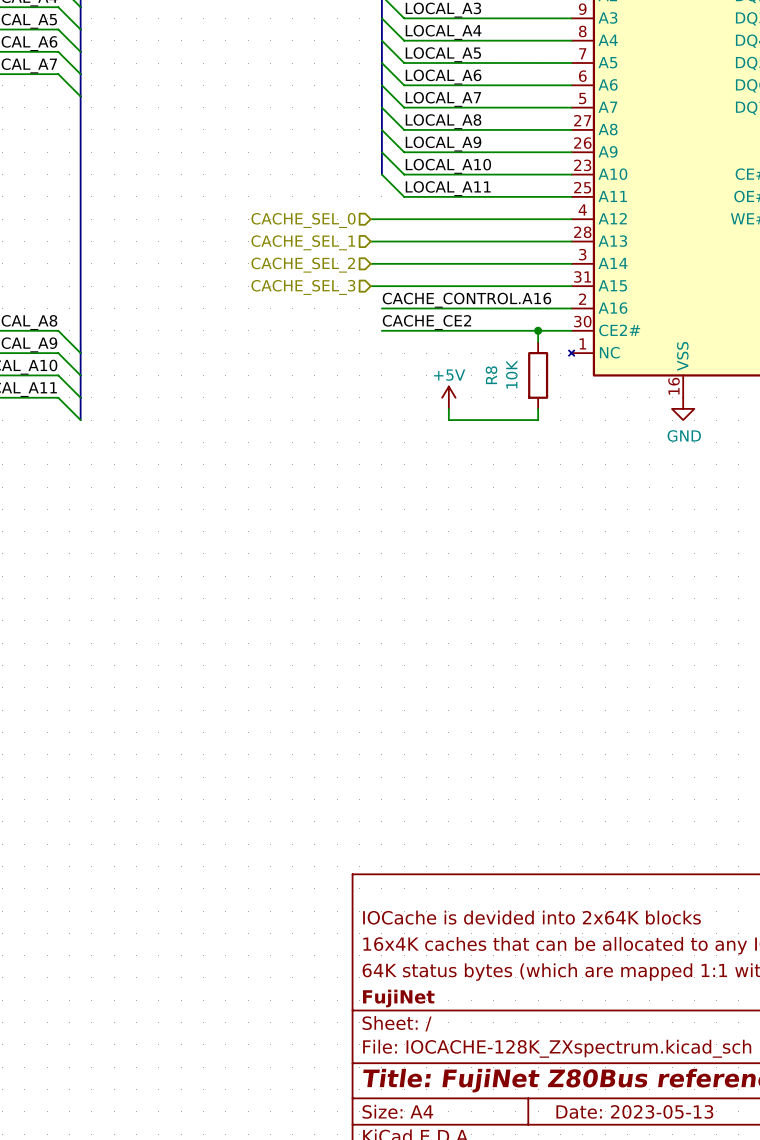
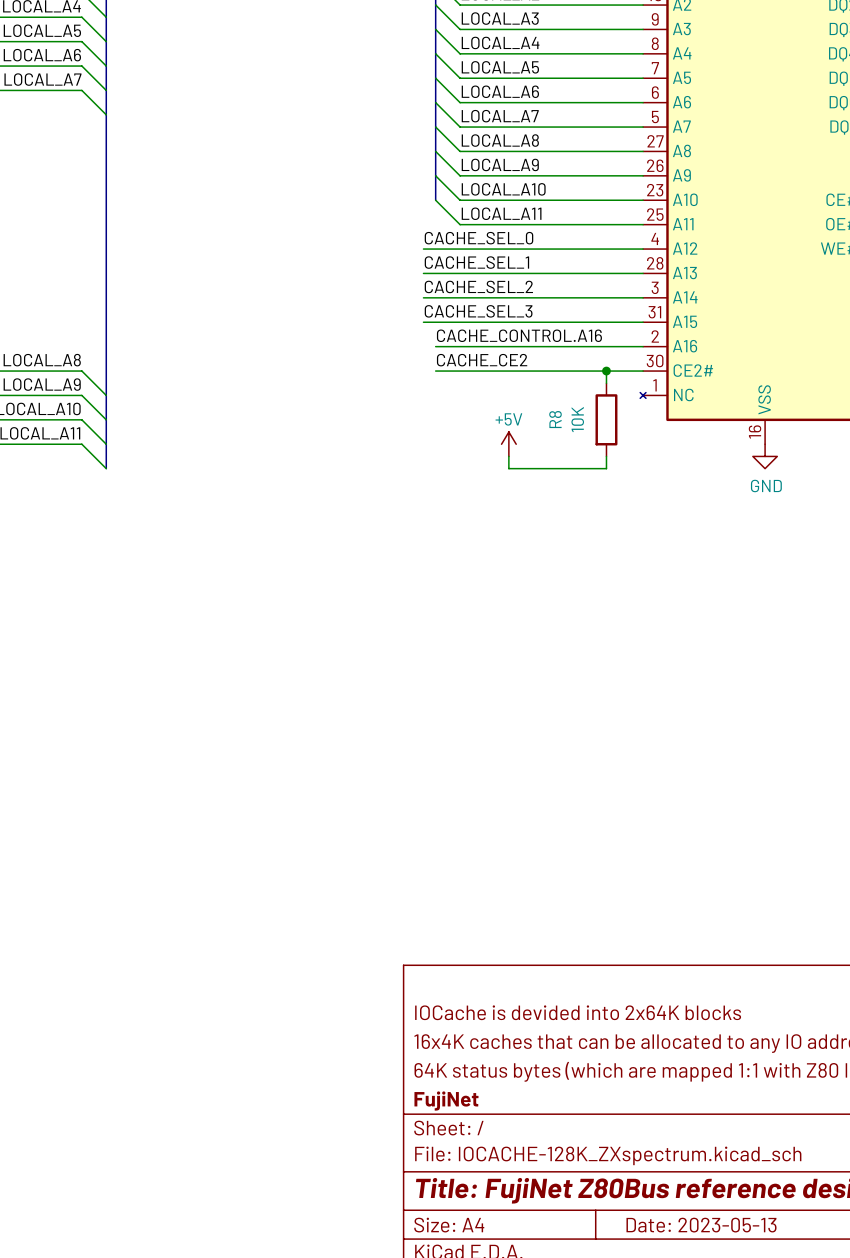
label: none -> CACHE_SEL_0 (478, 238)
hierarchical label: CACHE_SEL_0 (303, 220) -> none
label: none -> CACHE_SEL_1 (476, 262)
hierarchical label: CACHE_SEL_1 (303, 242) -> none
label: none -> CACHE_SEL_2 (478, 286)
hierarchical label: CACHE_SEL_2 (303, 265) -> none
label: none -> CACHE_SEL_3 (478, 311)
hierarchical label: CACHE_SEL_3 (303, 287) -> none

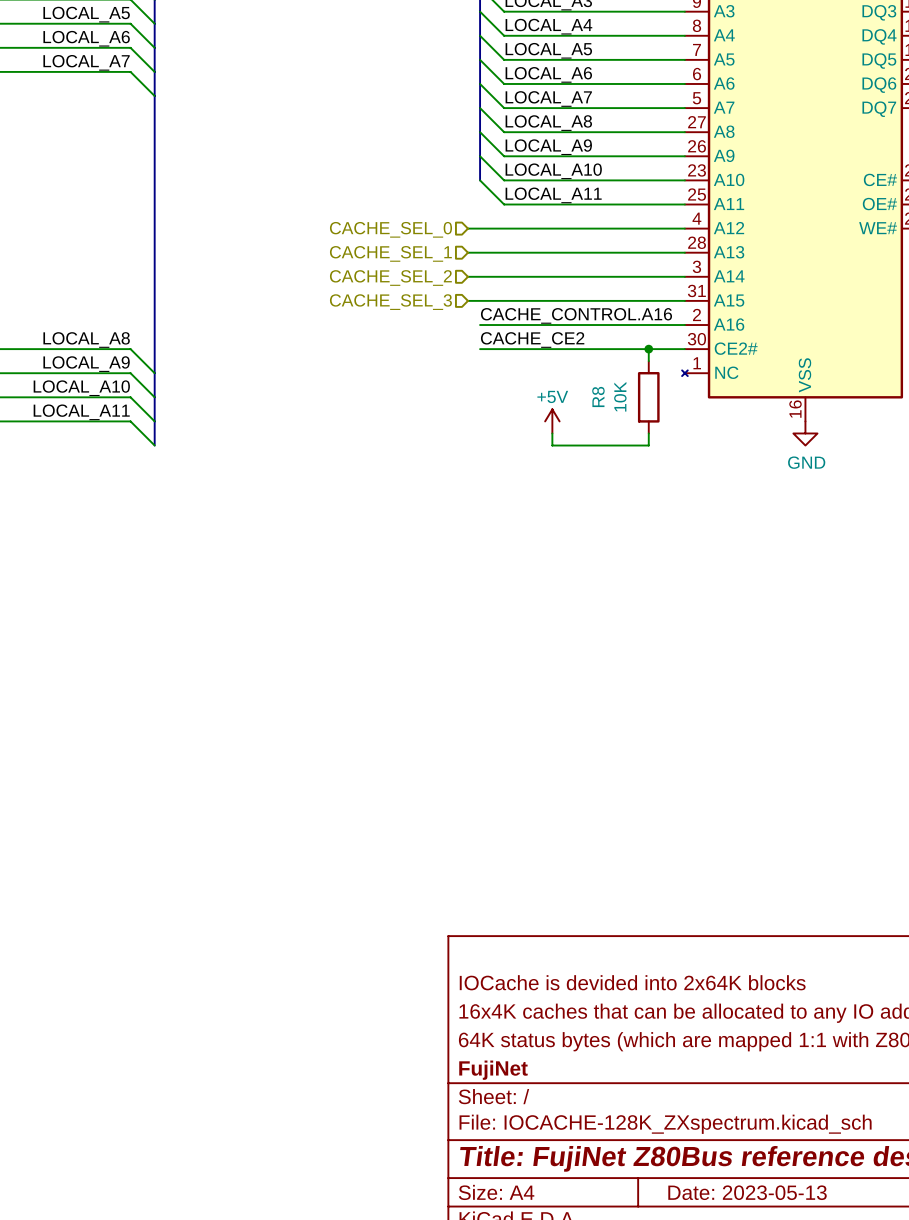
label: CACHE_SEL_0 (478, 238) -> none
hierarchical label: none -> CACHE_SEL_0 (390, 229)
label: CACHE_SEL_1 (476, 262) -> none
hierarchical label: none -> CACHE_SEL_1 (390, 253)
label: CACHE_SEL_2 (478, 286) -> none
hierarchical label: none -> CACHE_SEL_2 (390, 278)
label: CACHE_SEL_3 (478, 311) -> none
hierarchical label: none -> CACHE_SEL_3 (390, 302)

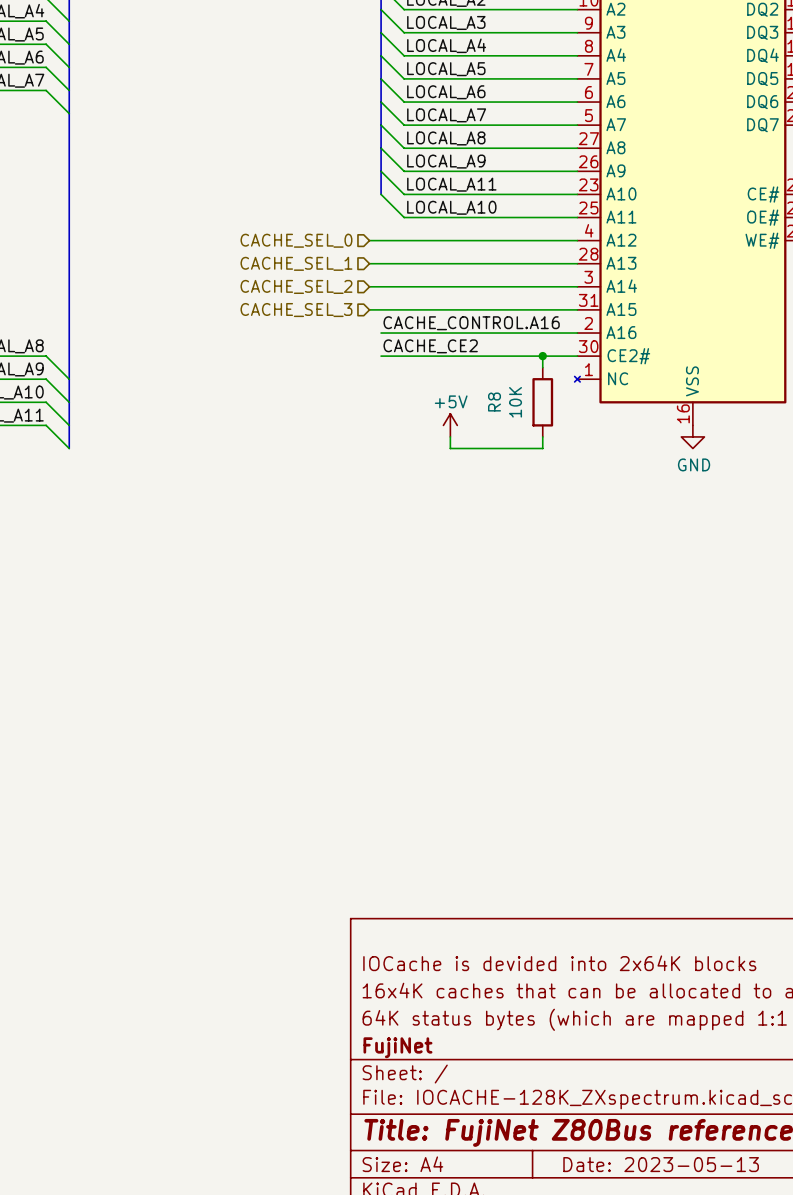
label: LOCAL_A10 (553, 171) -> LOCAL_A11 (451, 184)
label: LOCAL_A11 (553, 195) -> LOCAL_A10 (451, 207)

